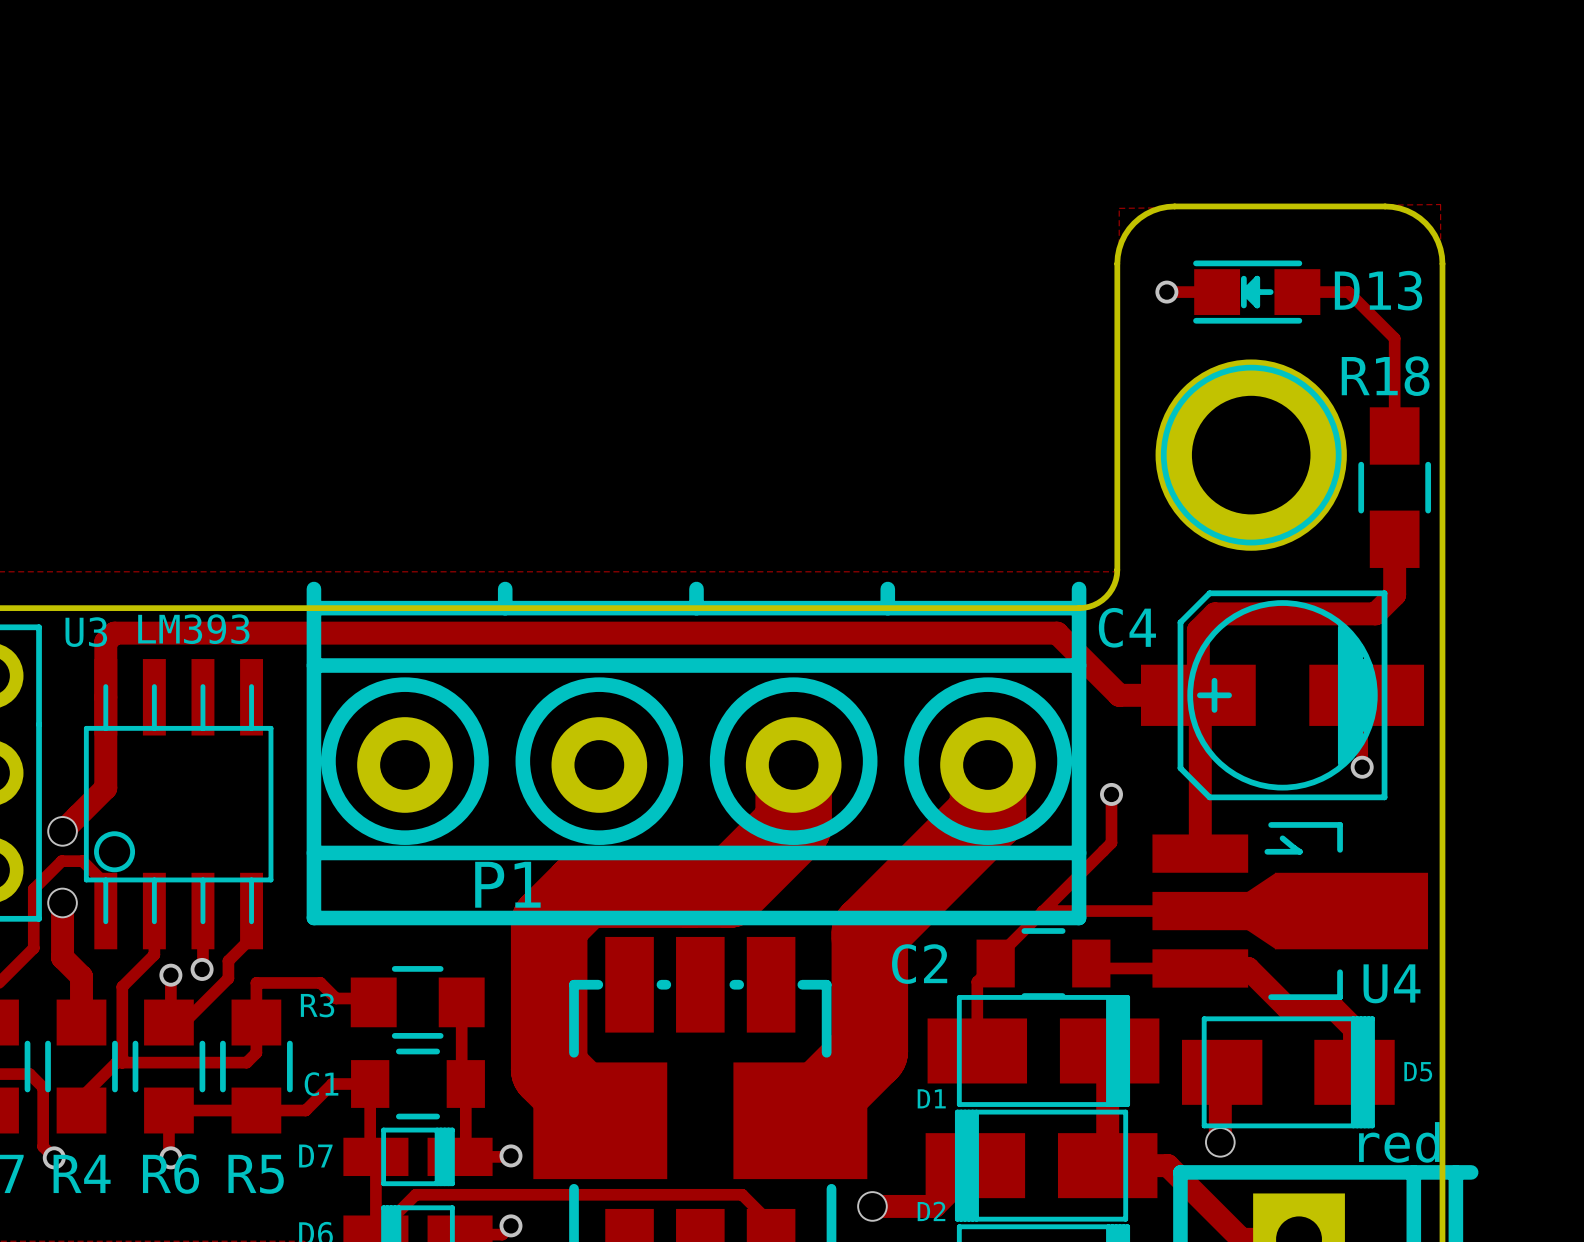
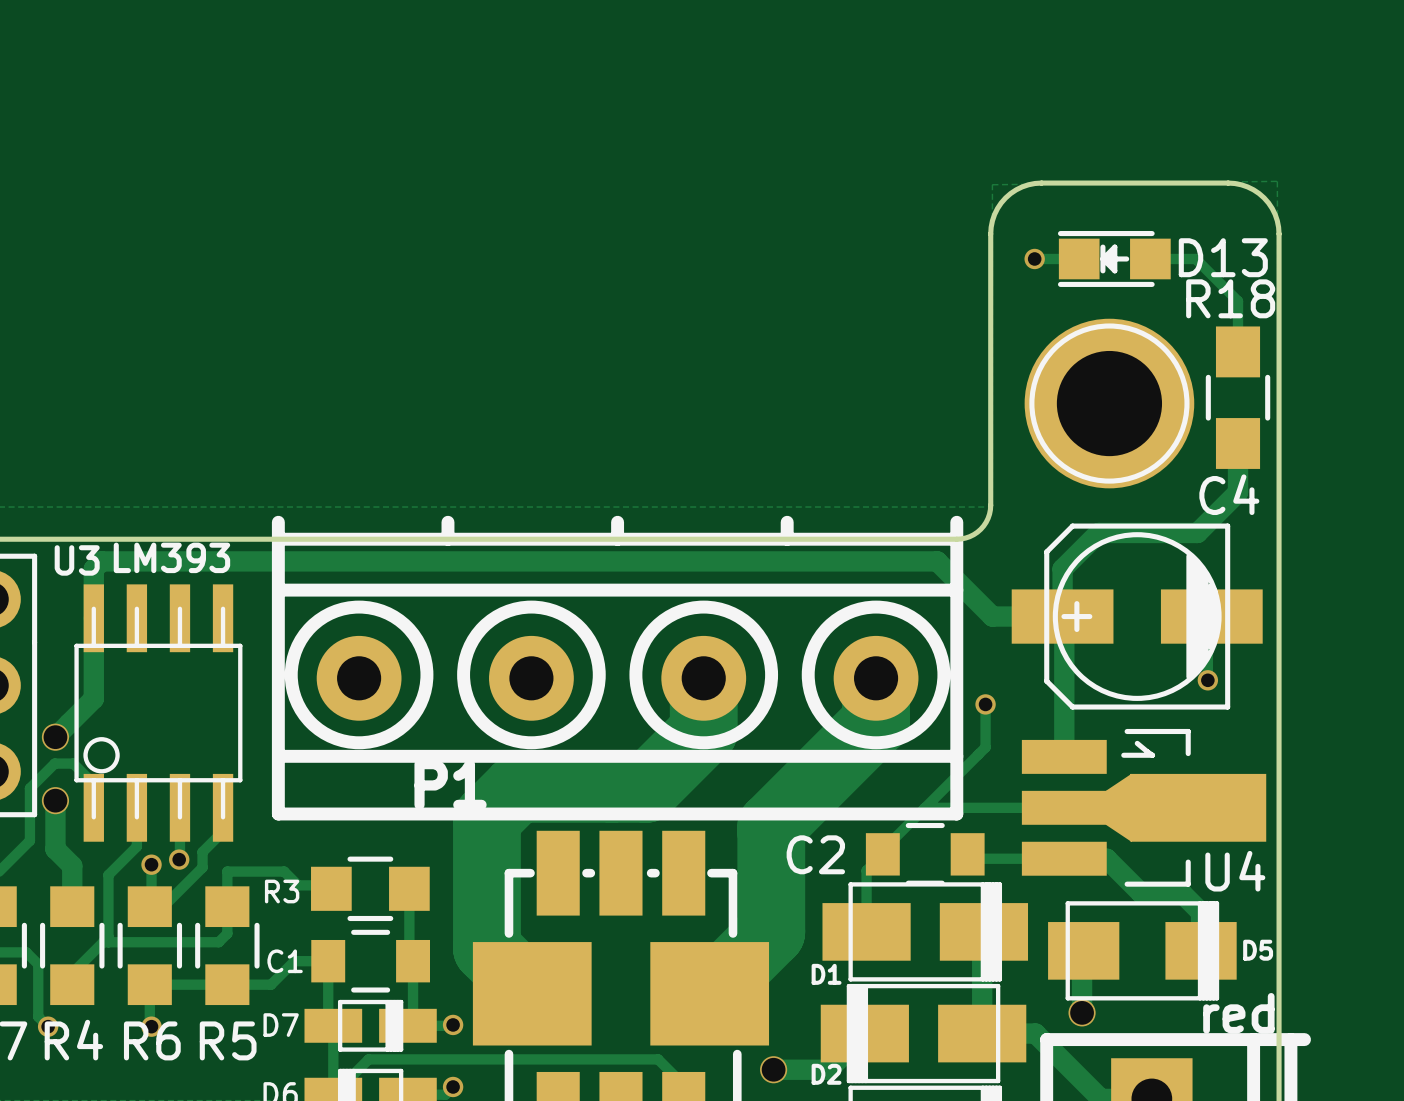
track: (1348, 292) (1394, 338) (1394, 435) -> (1195, 258) (1238, 301) (1238, 351)
R18 position: (1394, 487) -> (1238, 397)
track: (1394, 539) (1394, 594) (1375, 613) (1214, 613) (1198, 630) (1198, 641) -> (1238, 443) (1238, 492) (1197, 532) (1098, 532) (1062, 569)
C4 name position: C4 (1127, 627) -> C4 (1229, 494)

